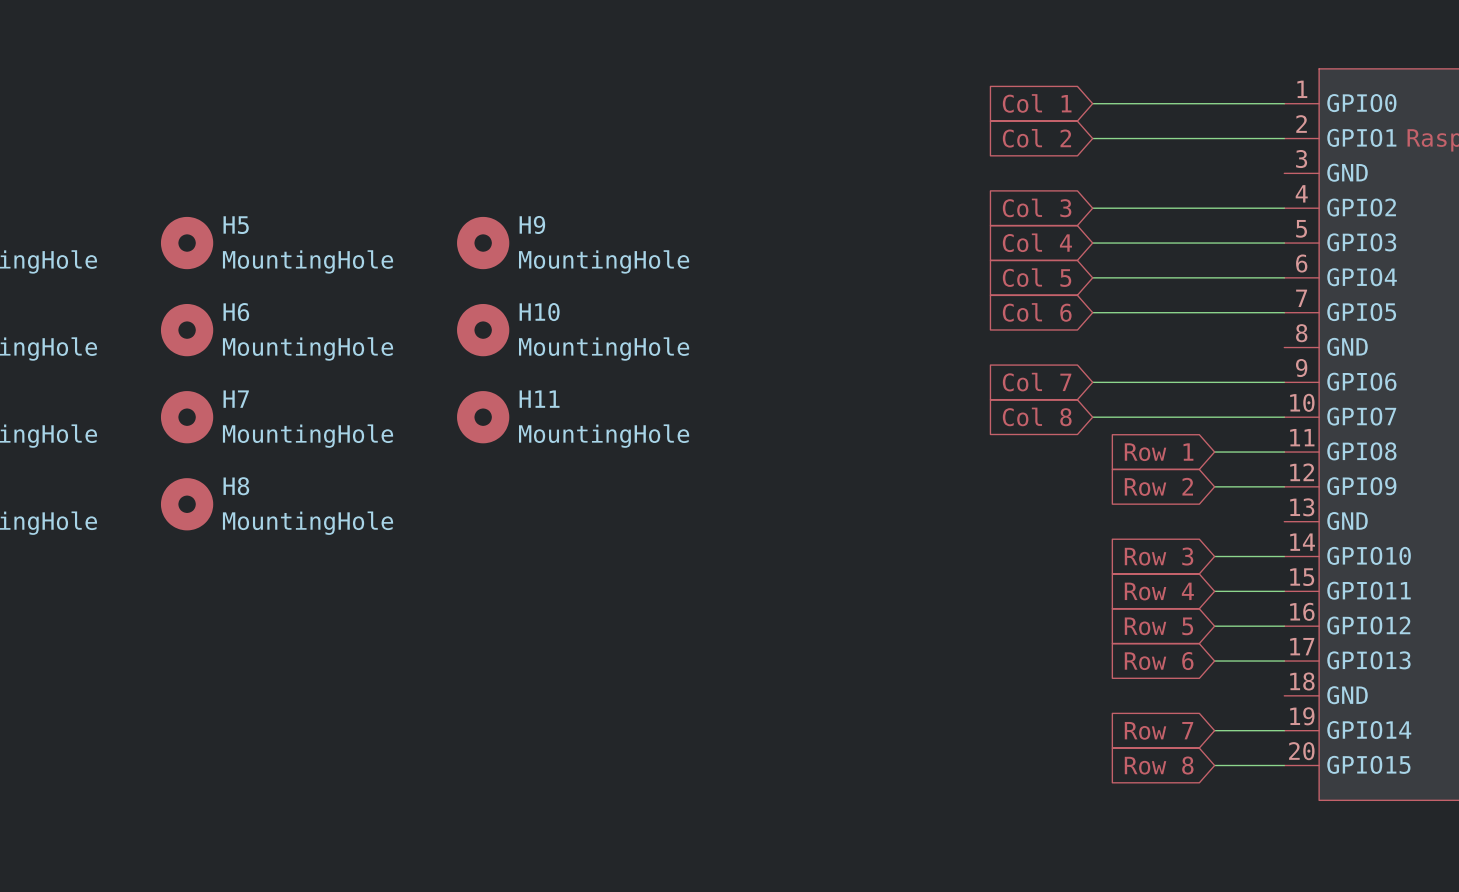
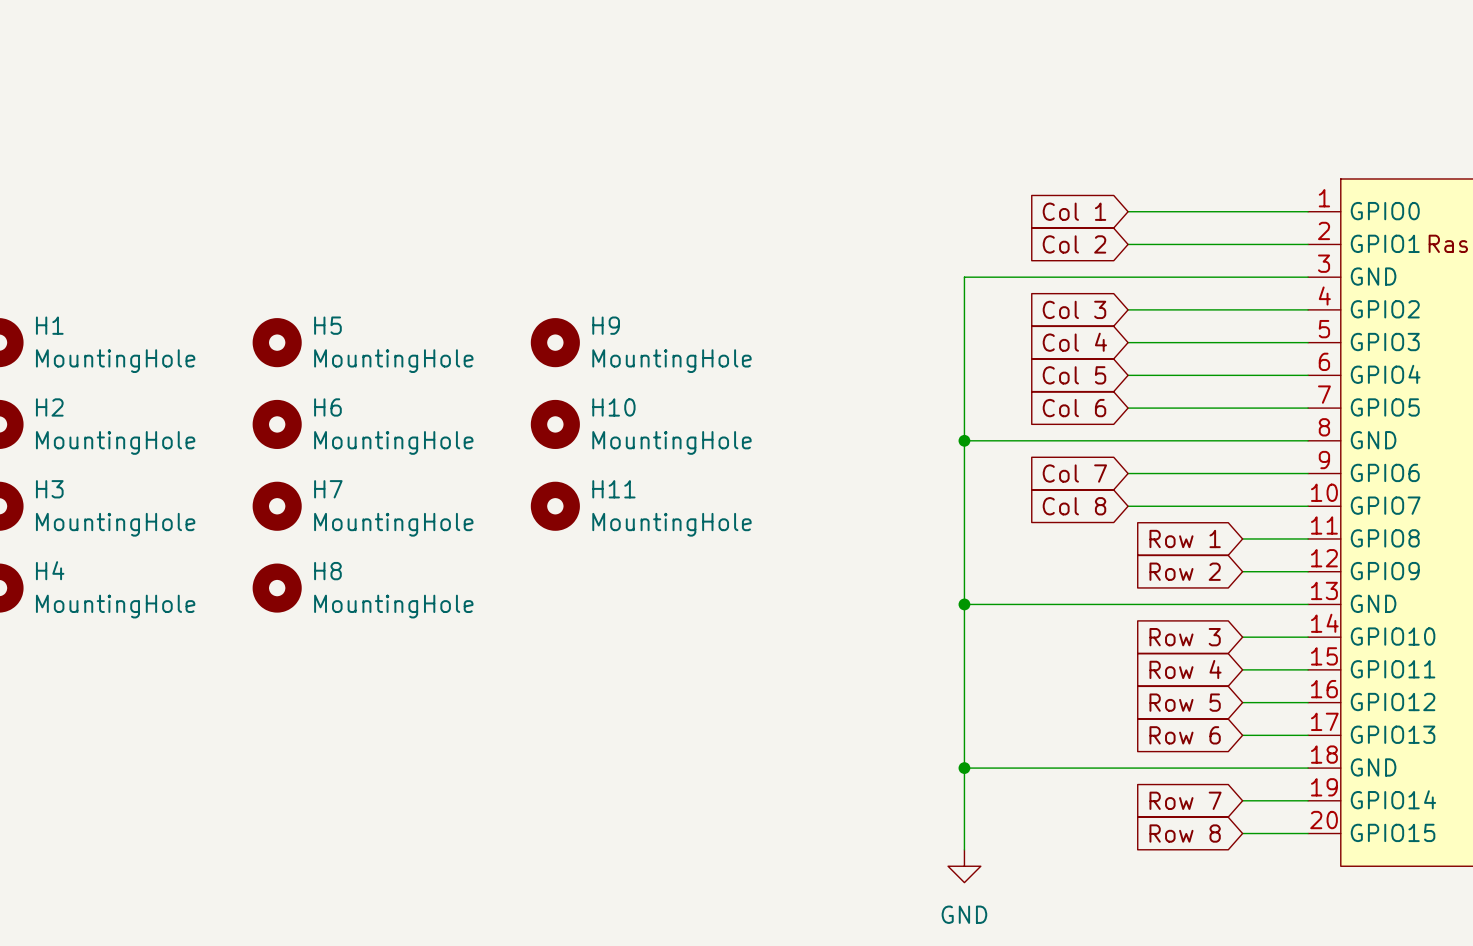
wire: none -> (1308, 277) (964, 277) (964, 849)
wire: none -> (964, 440) (1308, 440)
junction: none -> (964, 440)
wire: none -> (964, 604) (1308, 604)
junction: none -> (964, 604)
wire: none -> (964, 768) (1308, 768)
junction: none -> (964, 768)
power symbol: none -> GND (964, 866)

